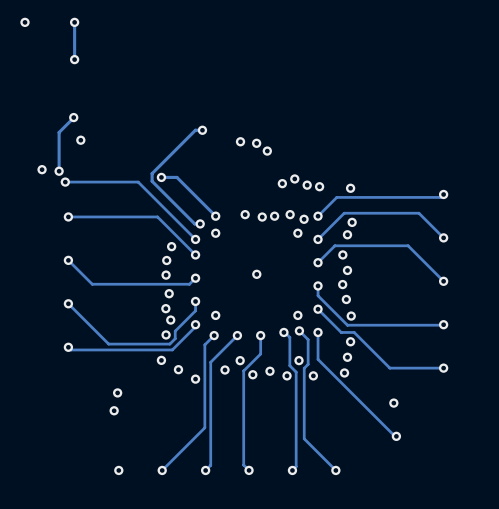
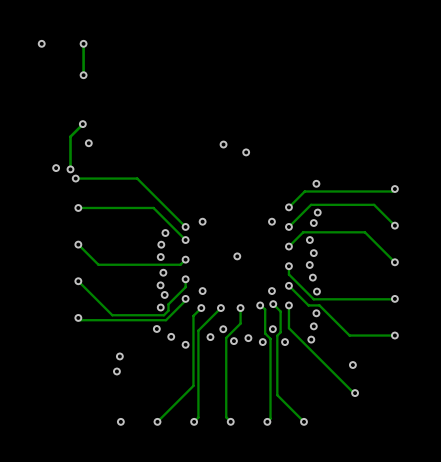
track: (202, 130) (195, 130) (152, 173) (152, 181) (194, 223) (200, 223) -> none
via: (202, 130) -> none
via: (256, 143) -> none
track: (161, 177) (176, 177) (215, 216) -> none
via: (161, 177) -> none
via: (294, 178) -> none
via: (282, 183) -> none
via: (307, 185) -> none
via: (319, 186) -> none
via: (245, 214) -> none
via: (290, 214) -> none
via: (215, 216) -> none
via: (274, 216) -> none
via: (262, 217) -> none
via: (304, 219) -> none
via: (200, 223) -> none

